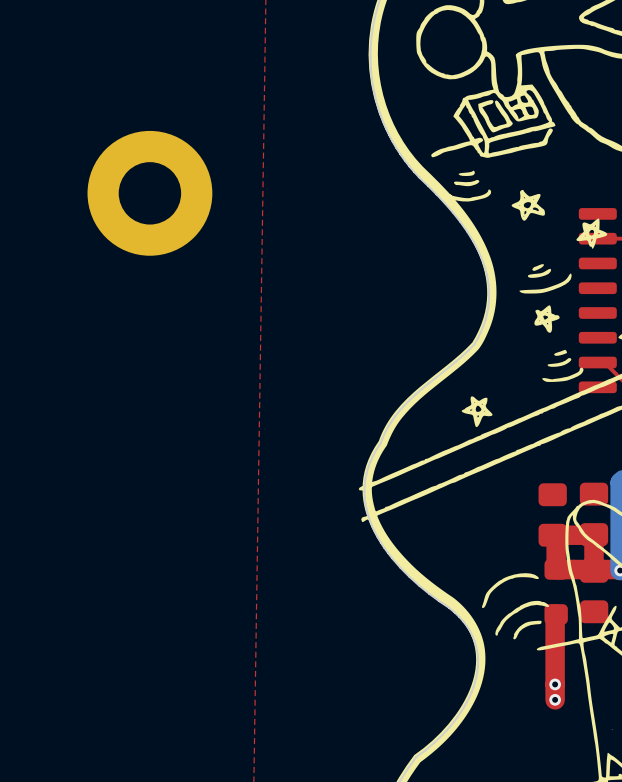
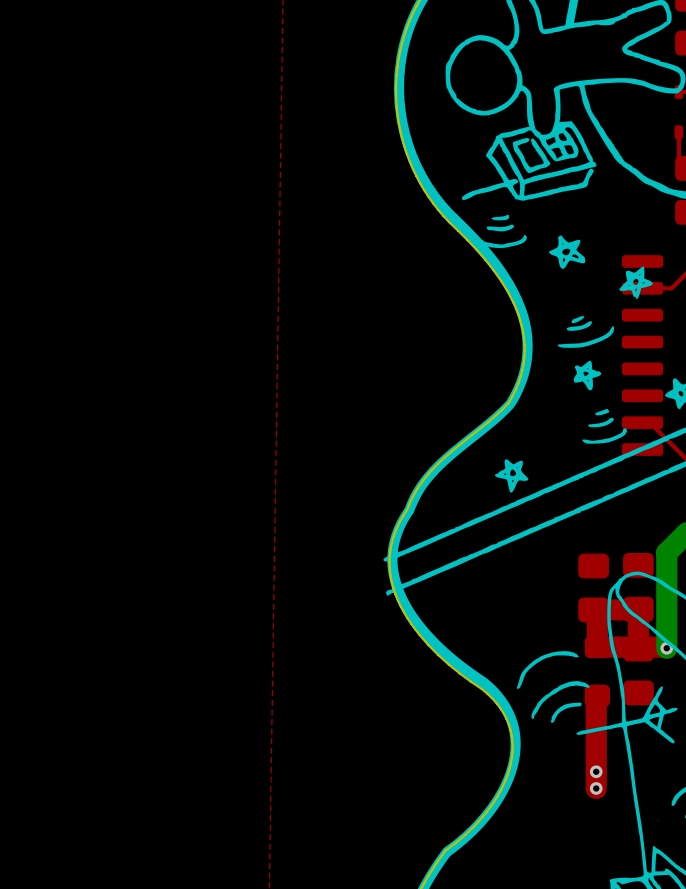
part: (149, 193) -> none

